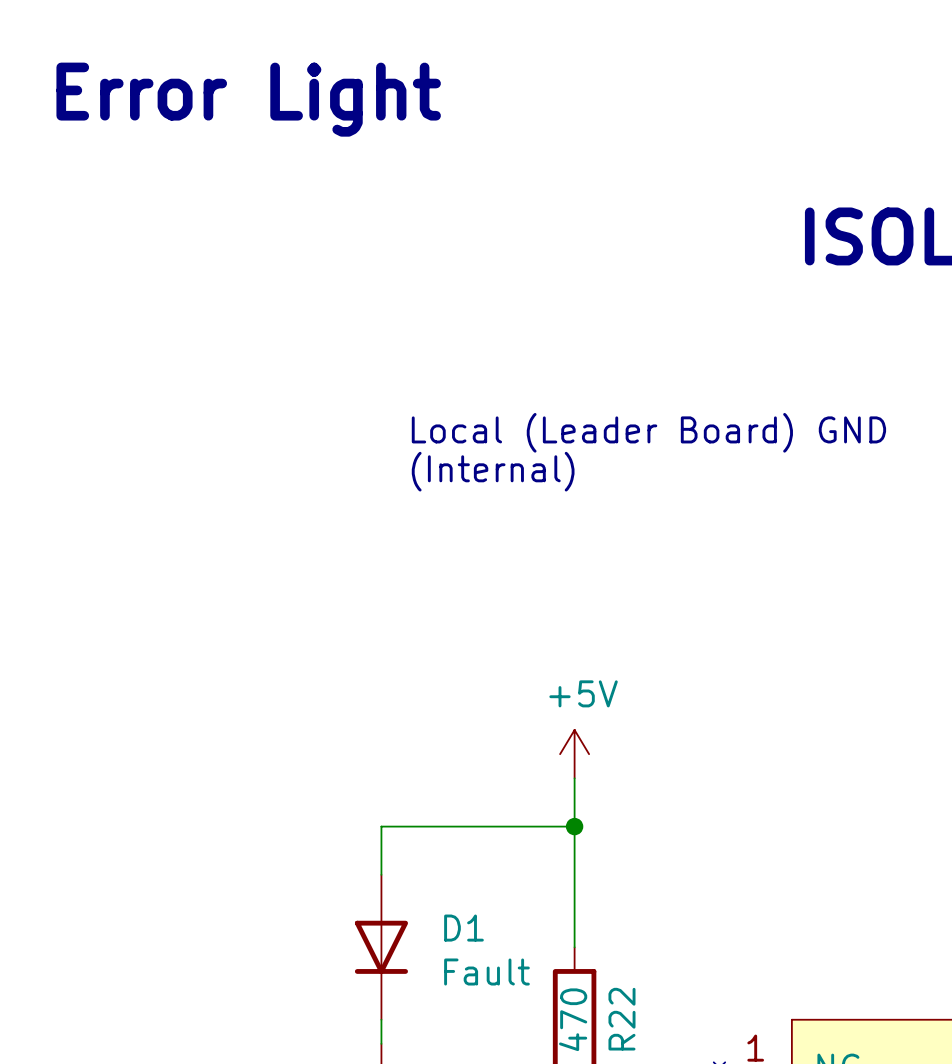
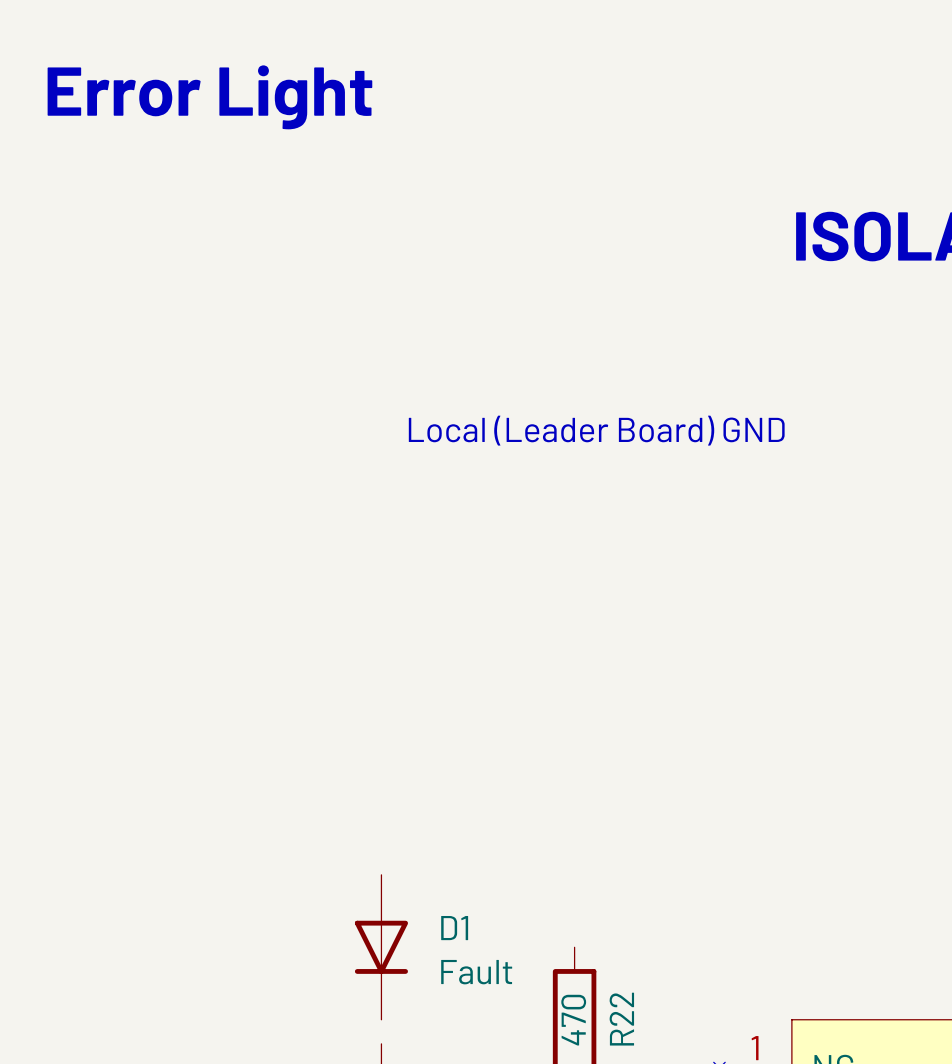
text: (Internal) (493, 471) -> none
power symbol: +5V (574, 754) -> none
wire: (574, 778) (574, 947) -> none
wire: (574, 826) (381, 826) (381, 874) -> none
junction: (574, 826) -> none
wire: (381, 1019) (381, 1043) -> none

